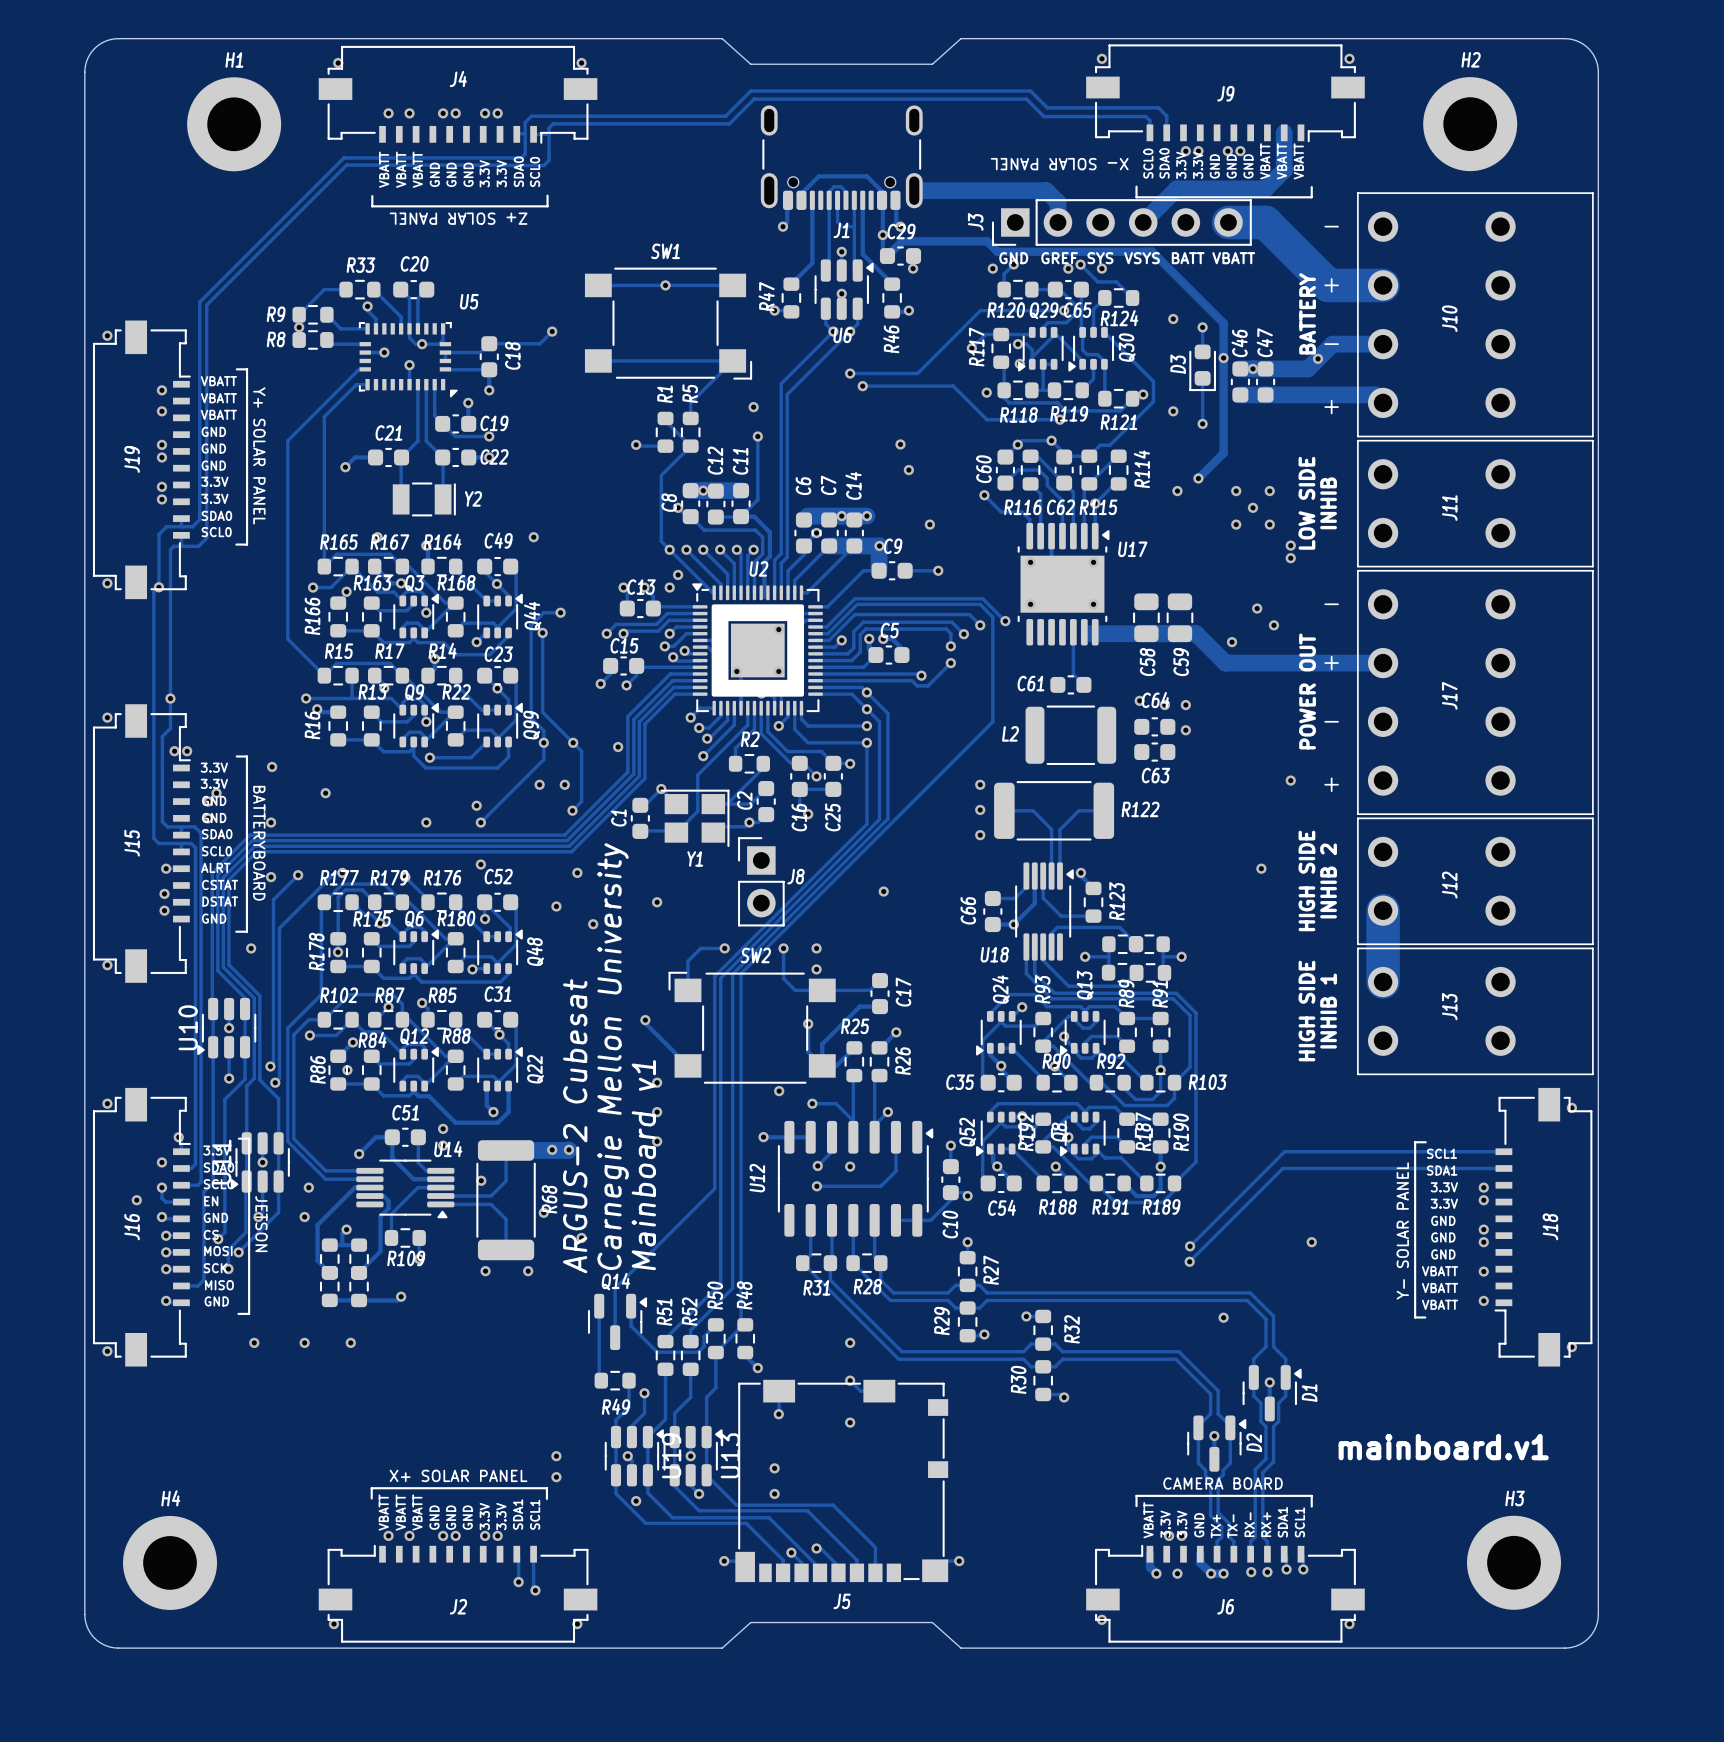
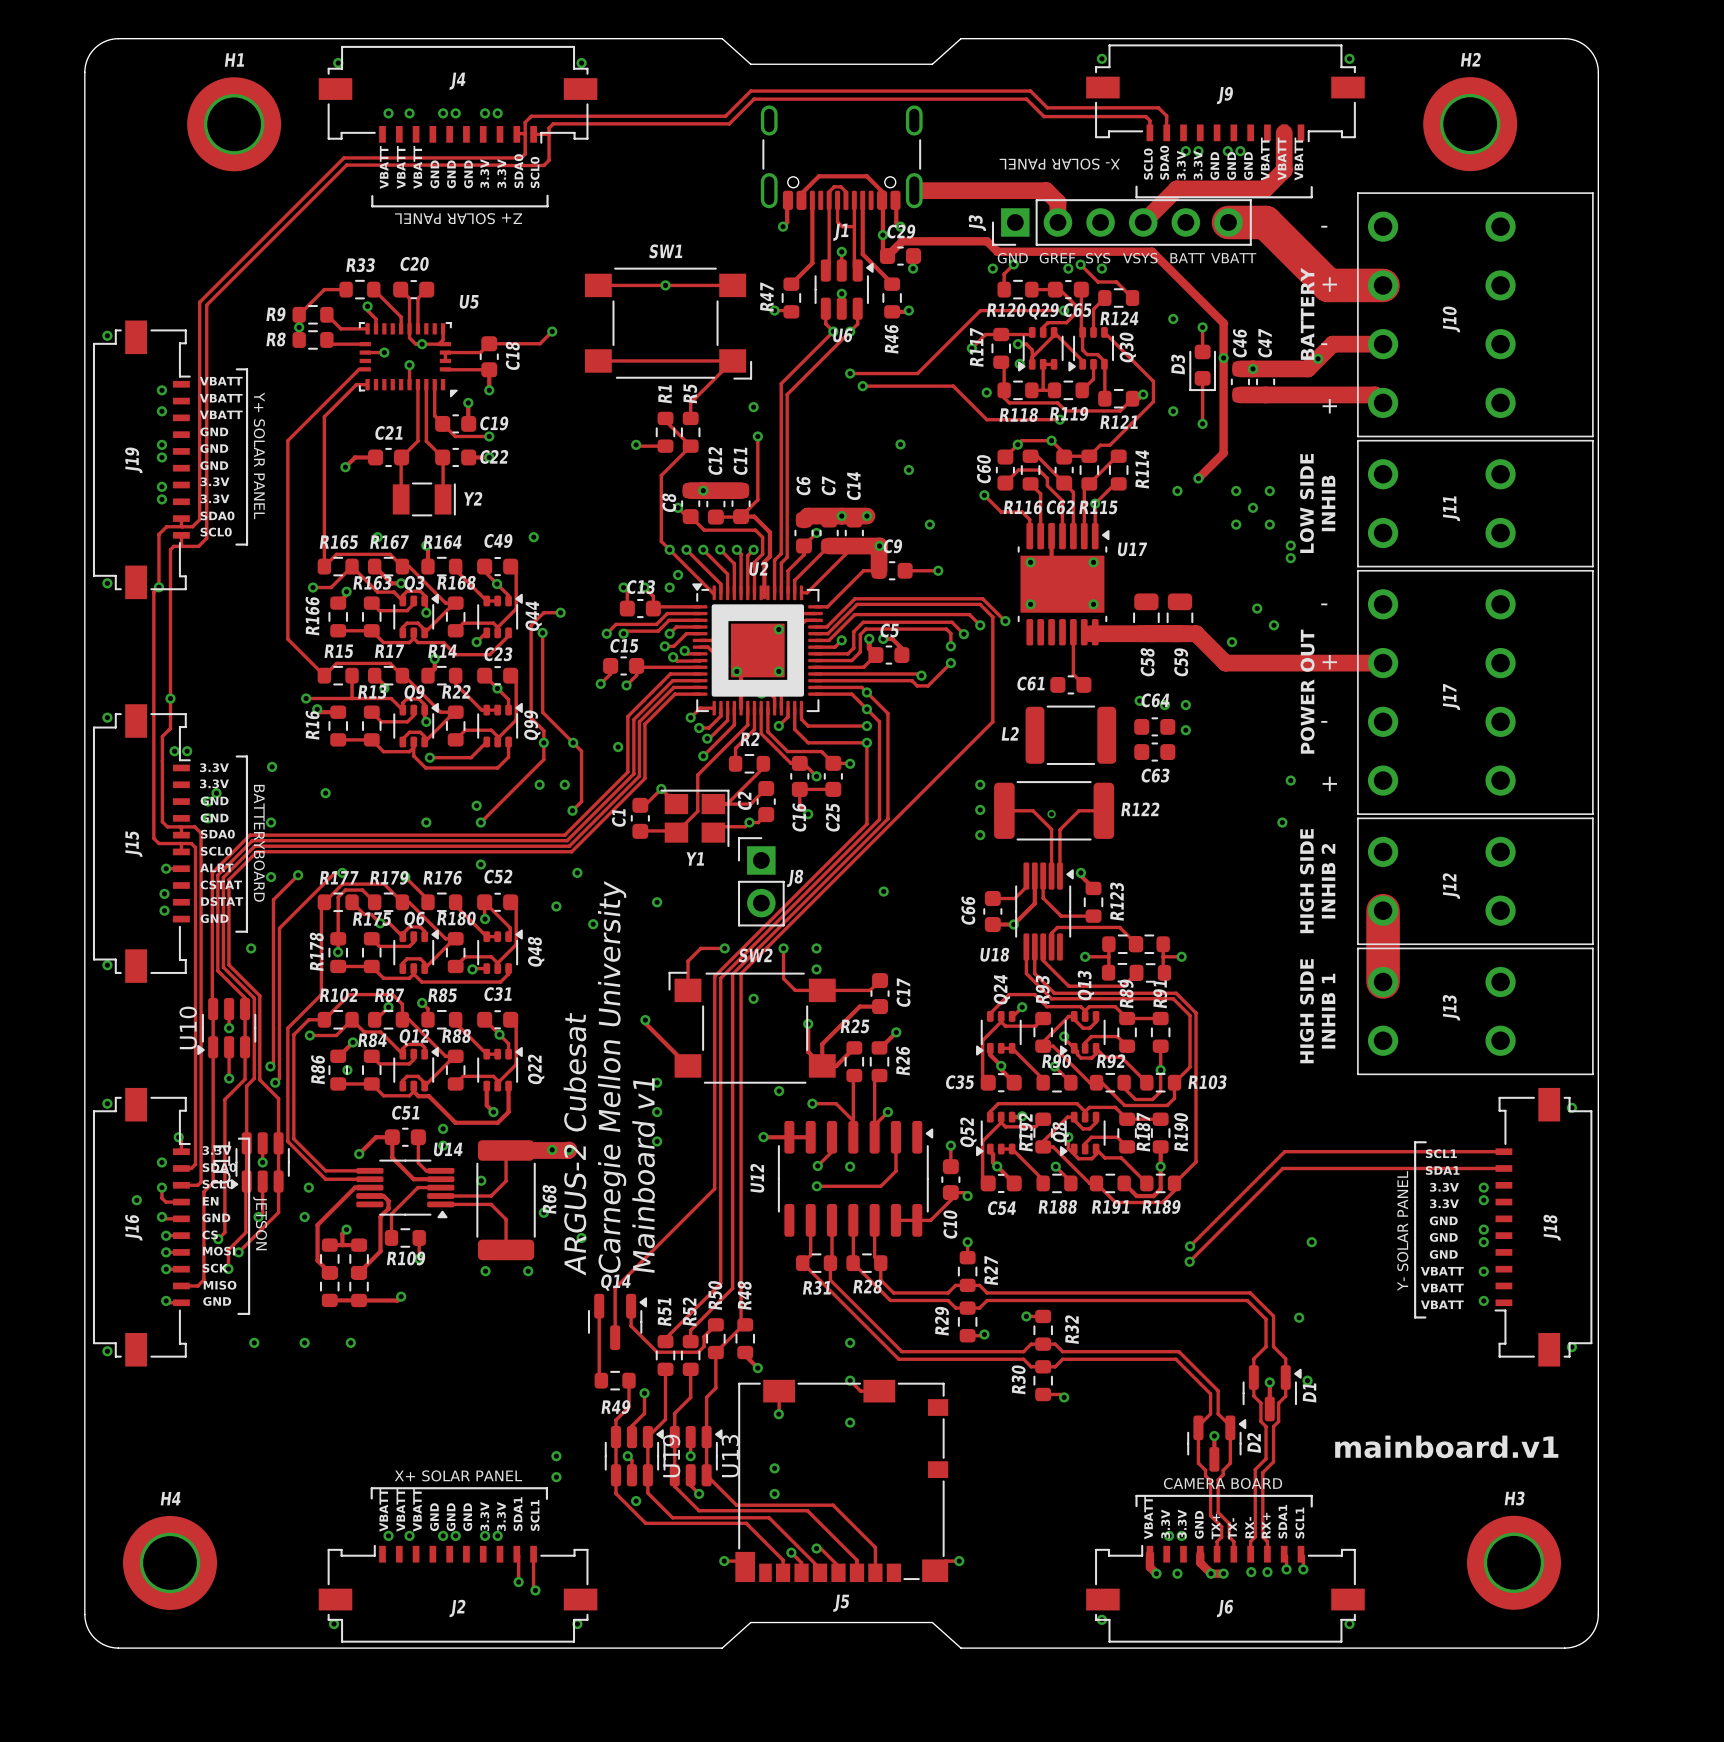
via: none -> (1051, 814)
via position: (1261, 868) -> (1282, 822)
via: none -> (753, 998)
via: (1223, 1317) -> none
via: none -> (1299, 1317)
via: none -> (1307, 1380)

